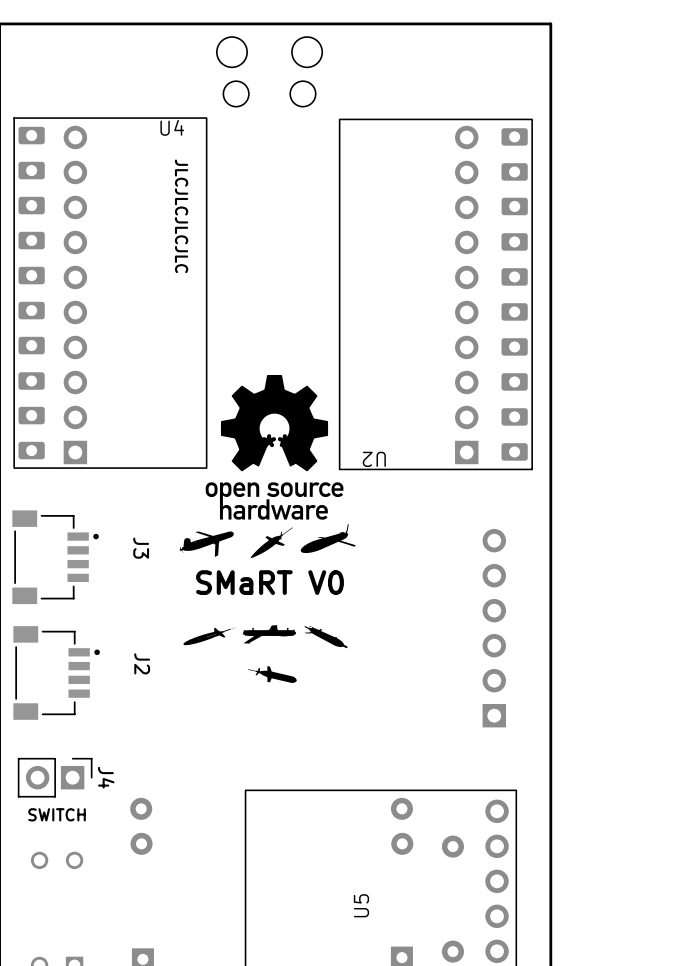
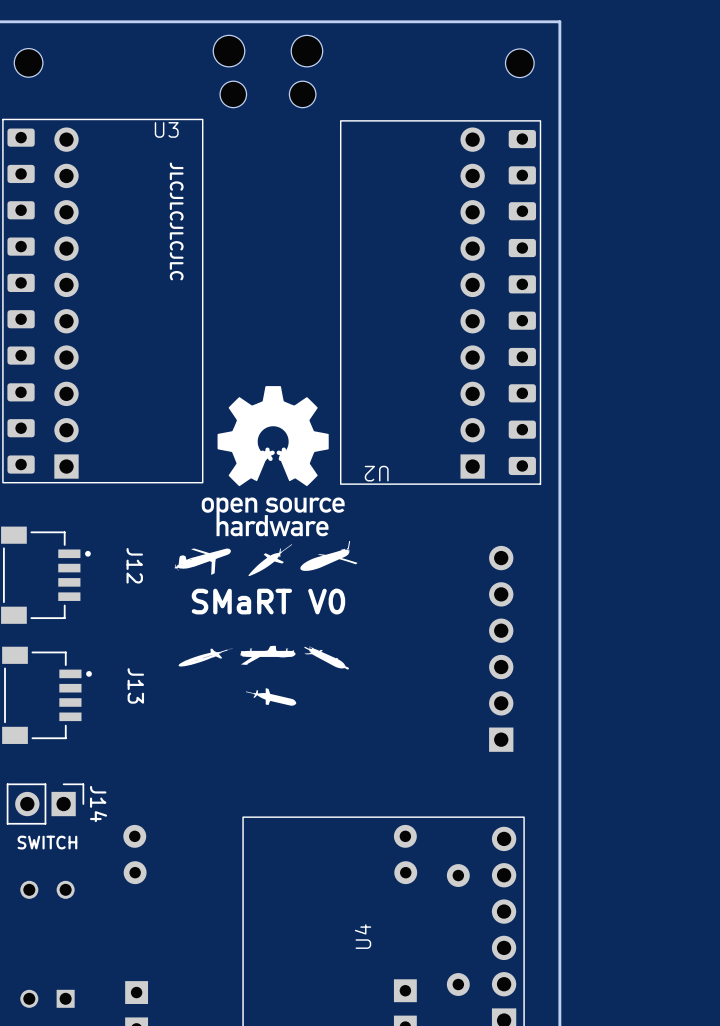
part: none -> (28, 62)
part: none -> (519, 63)
U4 name: U4 (172, 127) -> U3 (166, 129)
J3 name: J3 (141, 548) -> J12 (134, 565)
J2 name: J2 (142, 663) -> J13 (135, 685)
J4 name: J4 (106, 777) -> J14 (98, 804)
U5 name: U5 (361, 905) -> U4 (363, 936)

